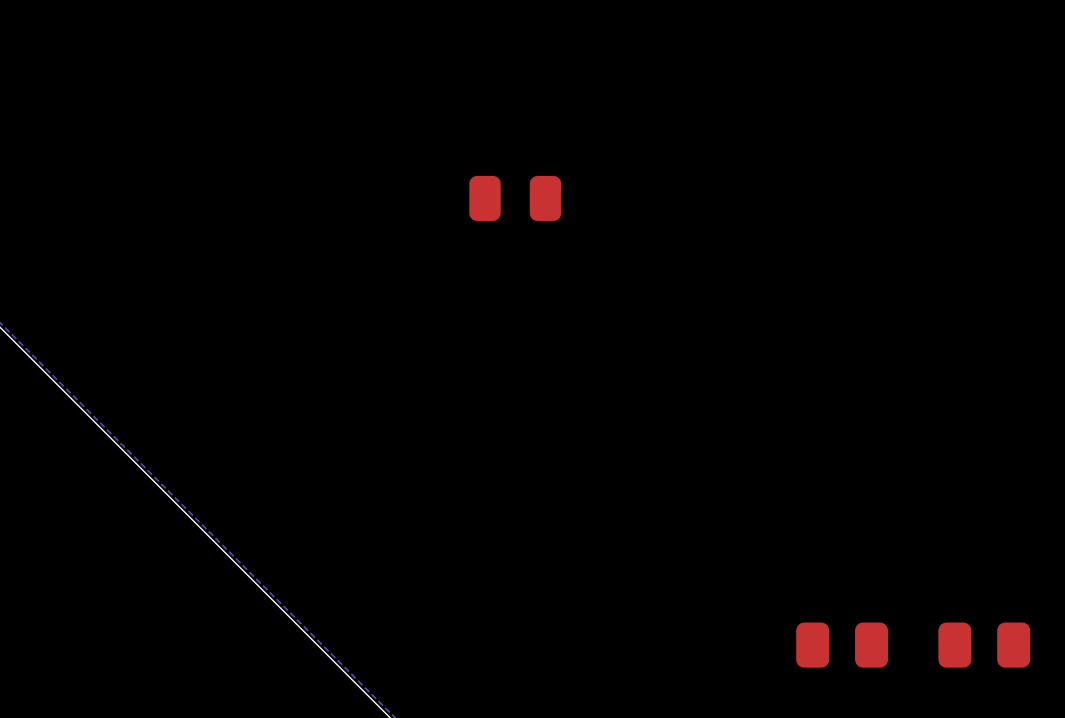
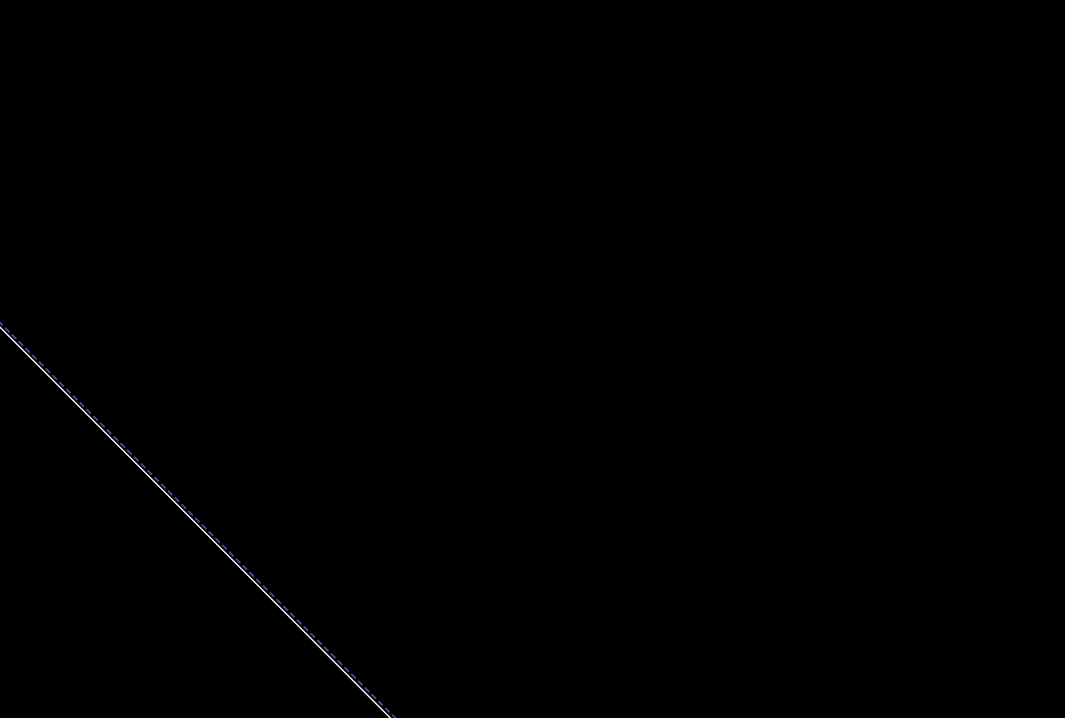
part: (515, 198) -> none
part: (842, 645) -> none
part: (984, 645) -> none

